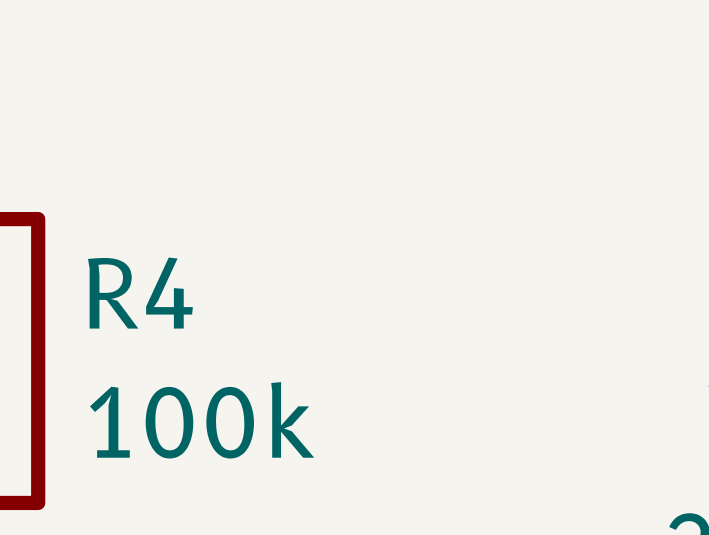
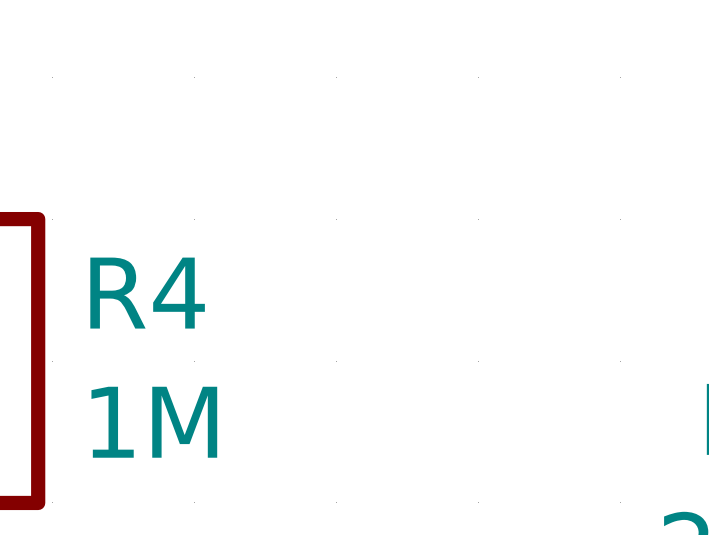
R4 value: 100k (202, 420) -> 1M (154, 422)

